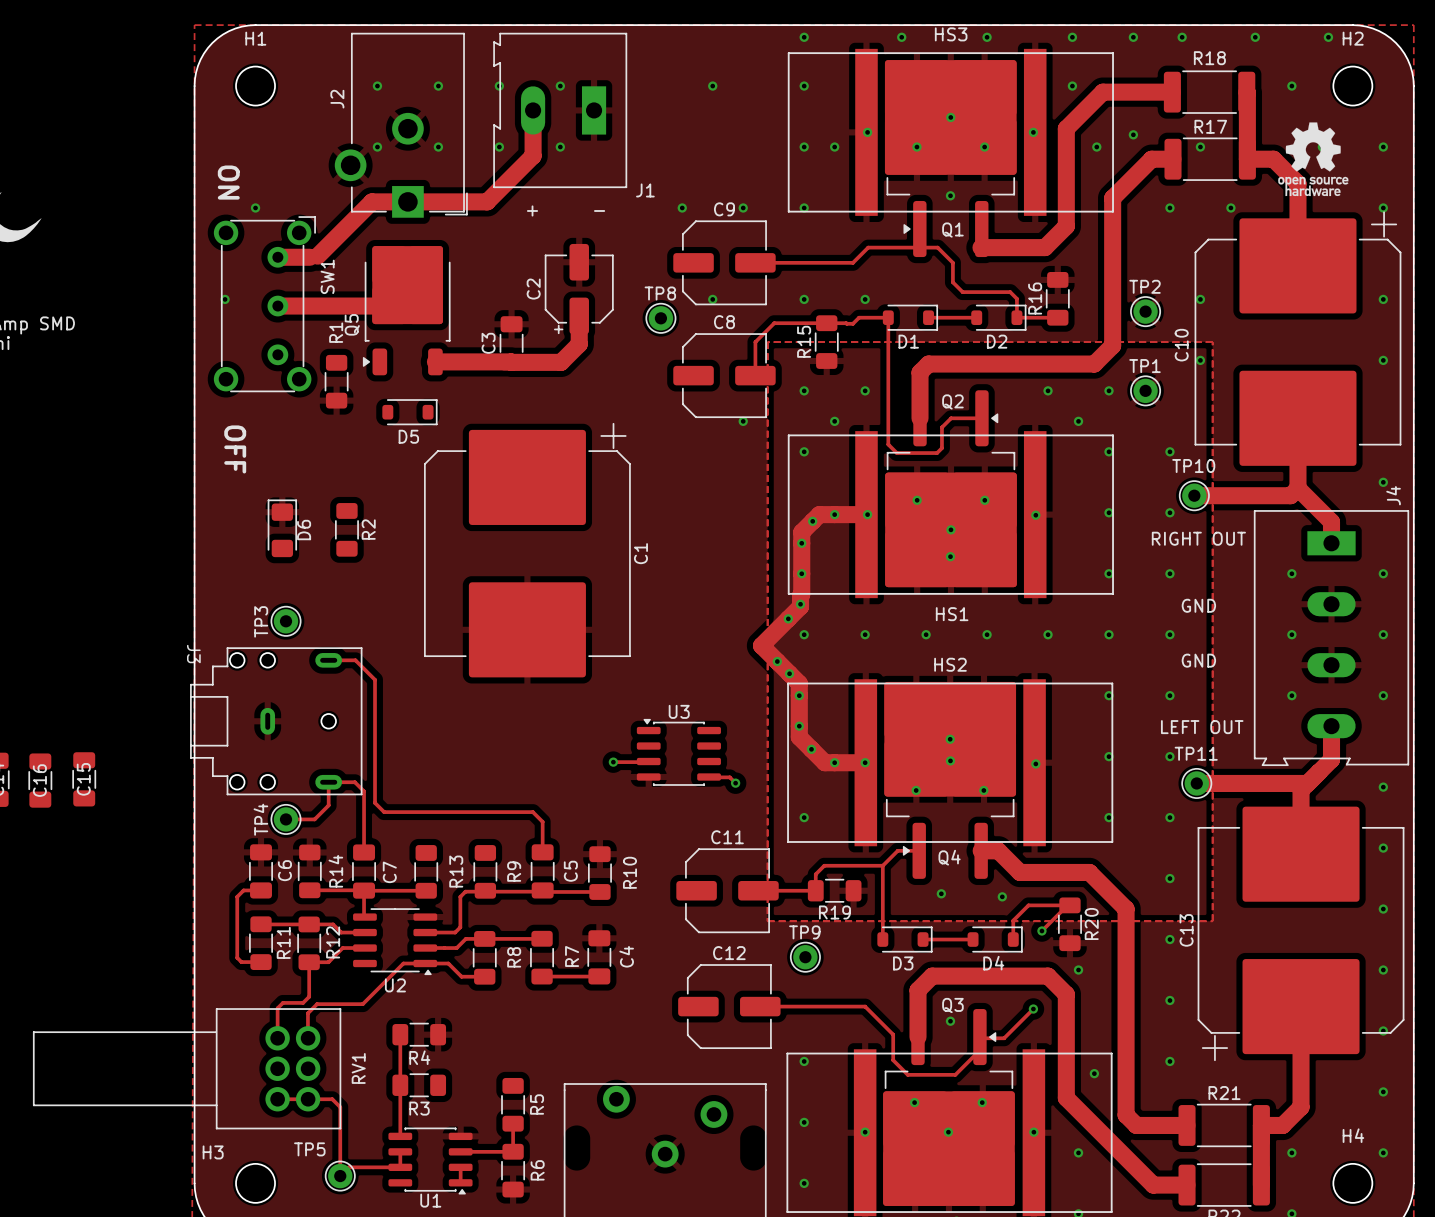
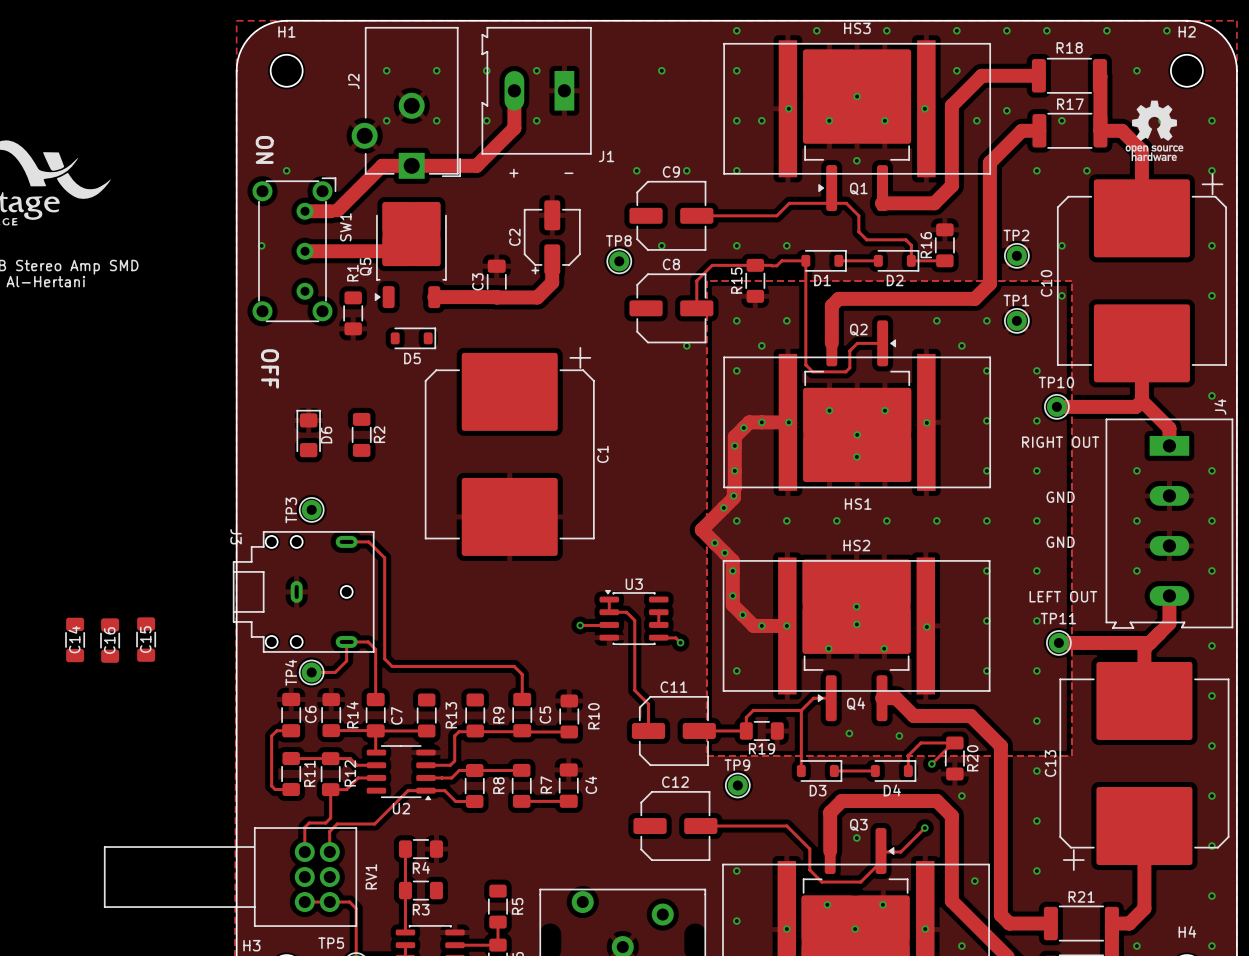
track: none -> (609, 599) (609, 612) (626, 612) (634, 620) (634, 690) (648, 704) (648, 730)
track: none -> (658, 612) (658, 624)

